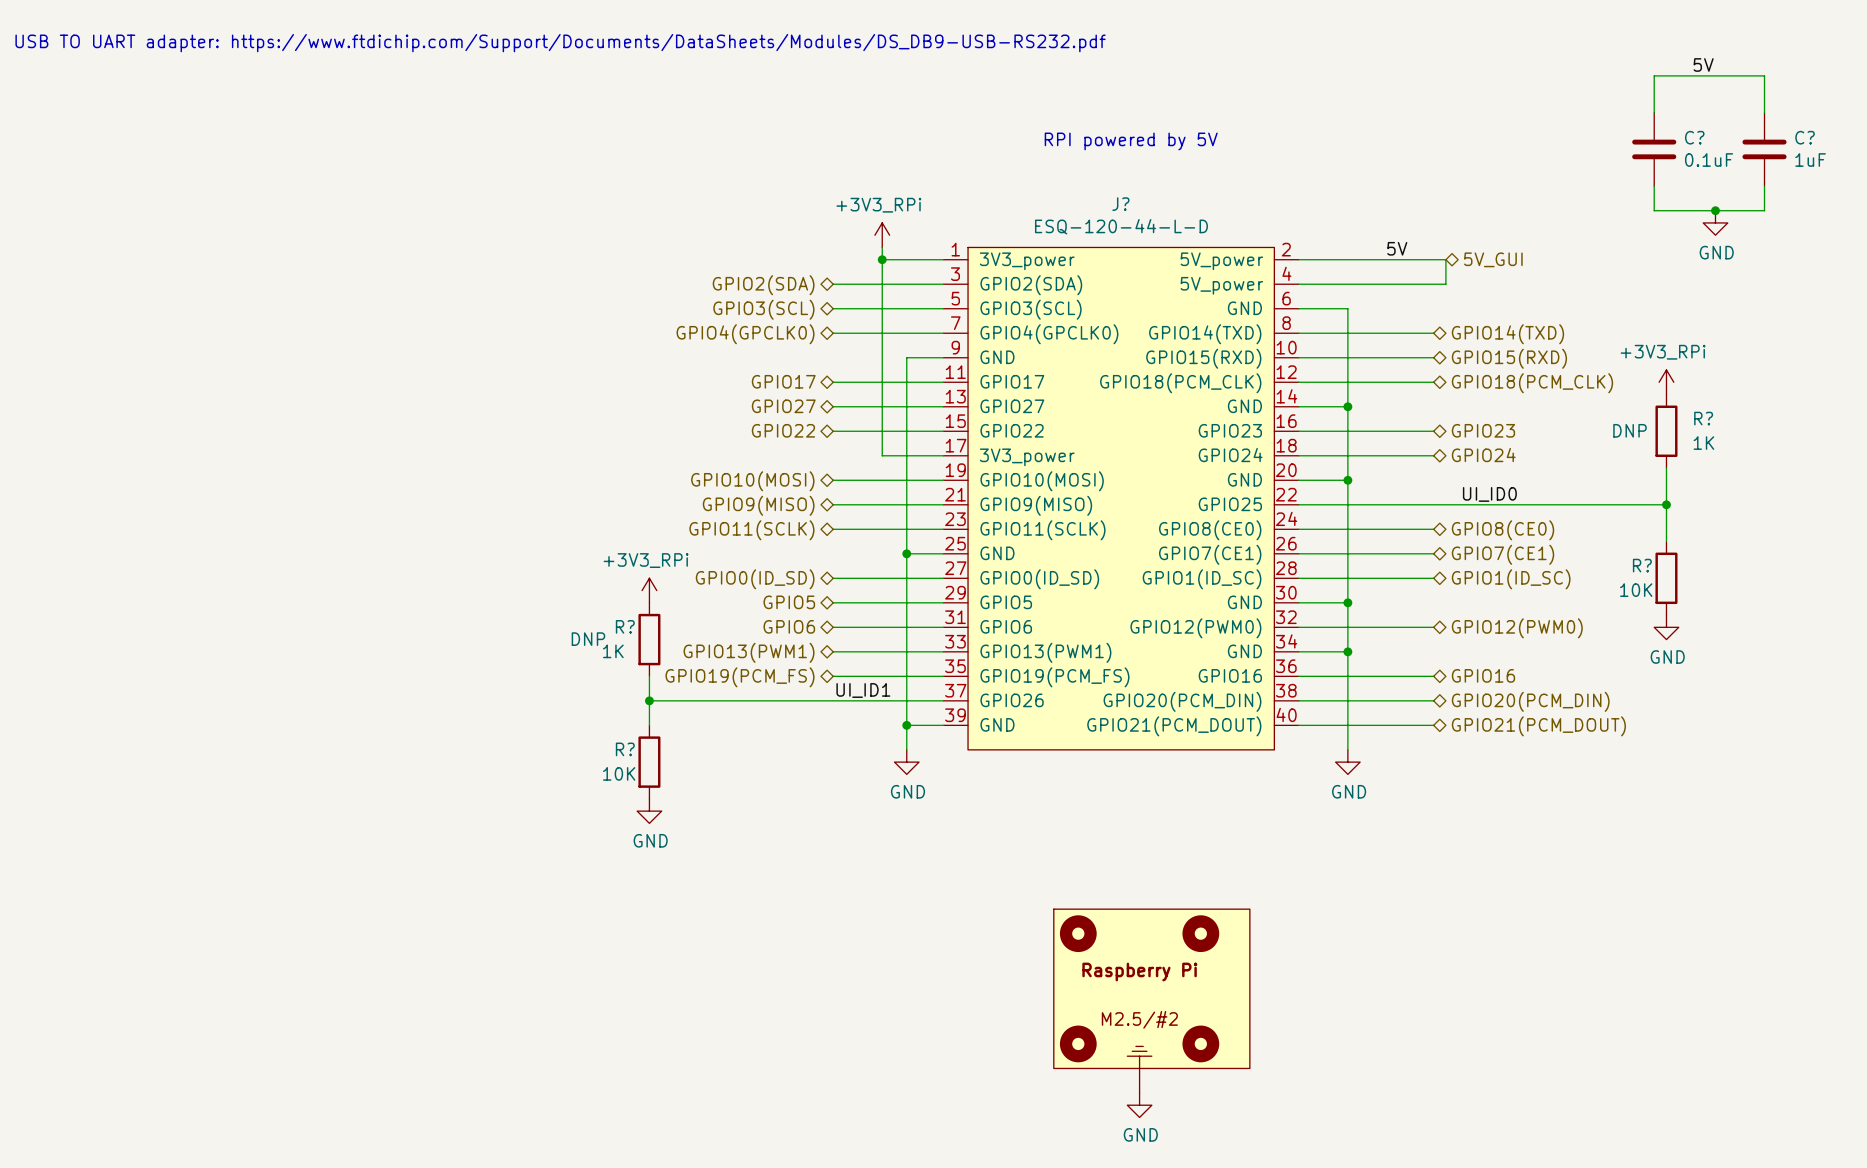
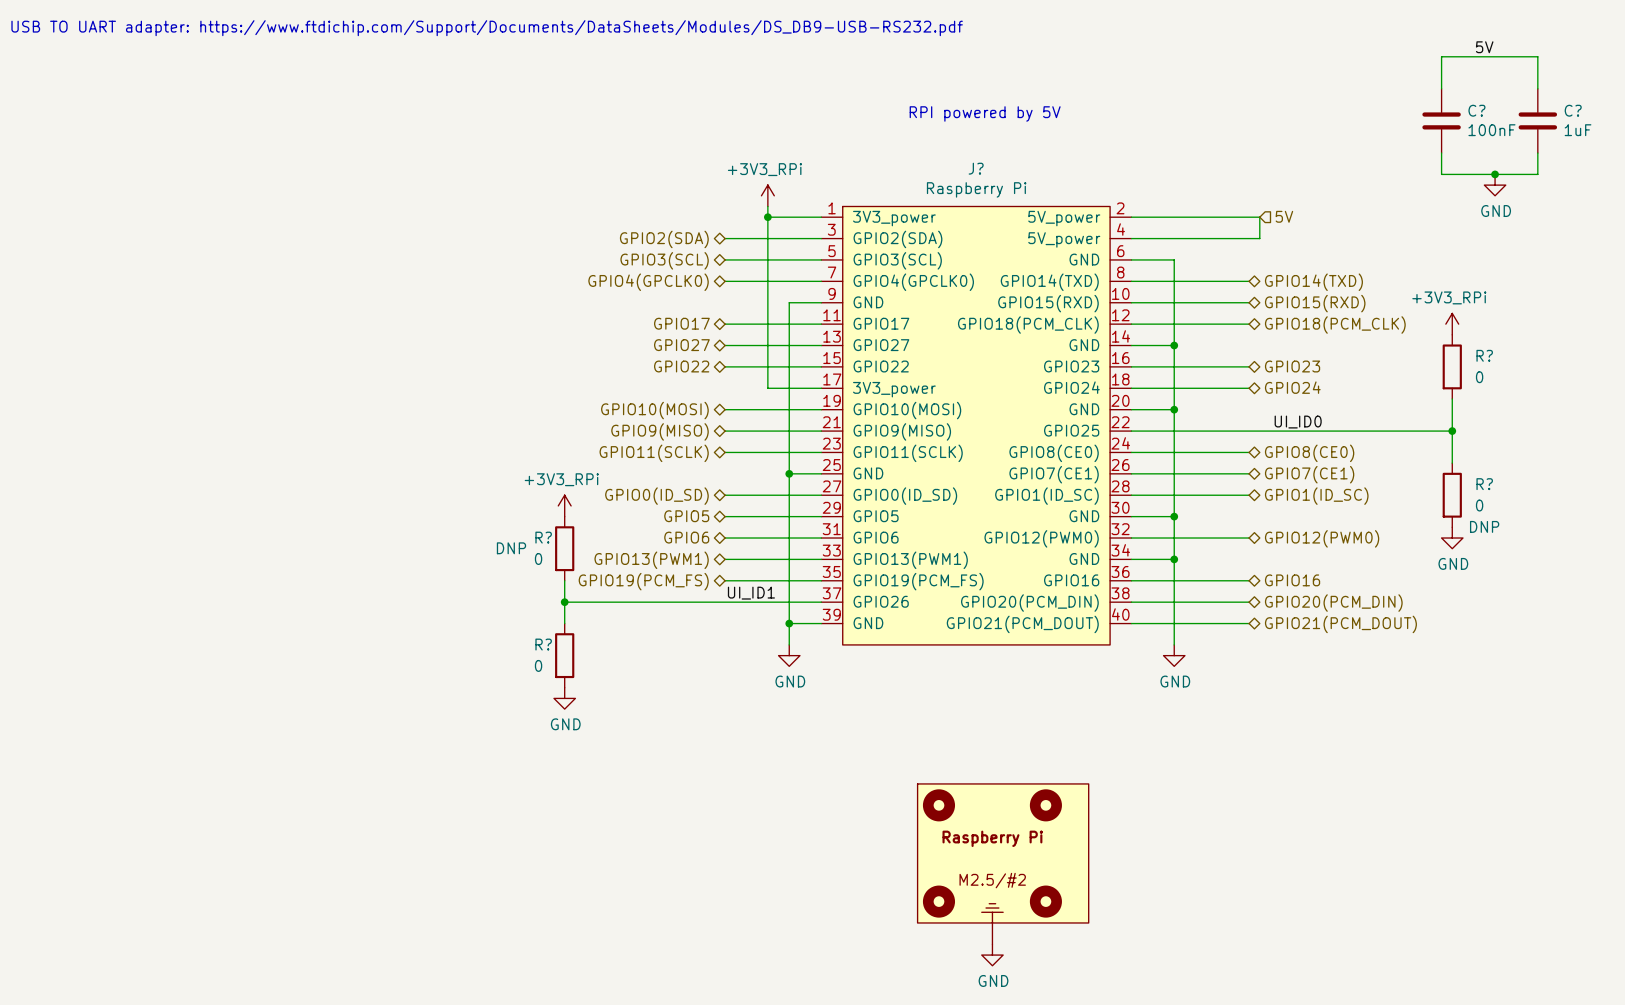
C? value: 0.1uF (1709, 160) -> 100nF (1491, 130)
J? value: ESQ-120-44-L-D (1121, 226) -> Raspberry Pi (976, 189)
label: 5V (1397, 248) -> none
hierarchical label shape: bidirectional (1493, 259) -> input (1284, 216)
hierarchical label: 5V_GUI (1493, 259) -> 5V (1284, 216)
R? text: DNP (1630, 430) -> none
R? value: 1K (1703, 443) -> 0 (1479, 377)
R? name position: R? (1642, 565) -> R? (1484, 484)
R? value: 10K (1636, 590) -> 0 (1479, 505)
R? text: none -> DNP (1484, 526)
R? value: 1K (613, 651) -> 0 (538, 558)
R? value: 10K (619, 773) -> 0 (538, 665)

